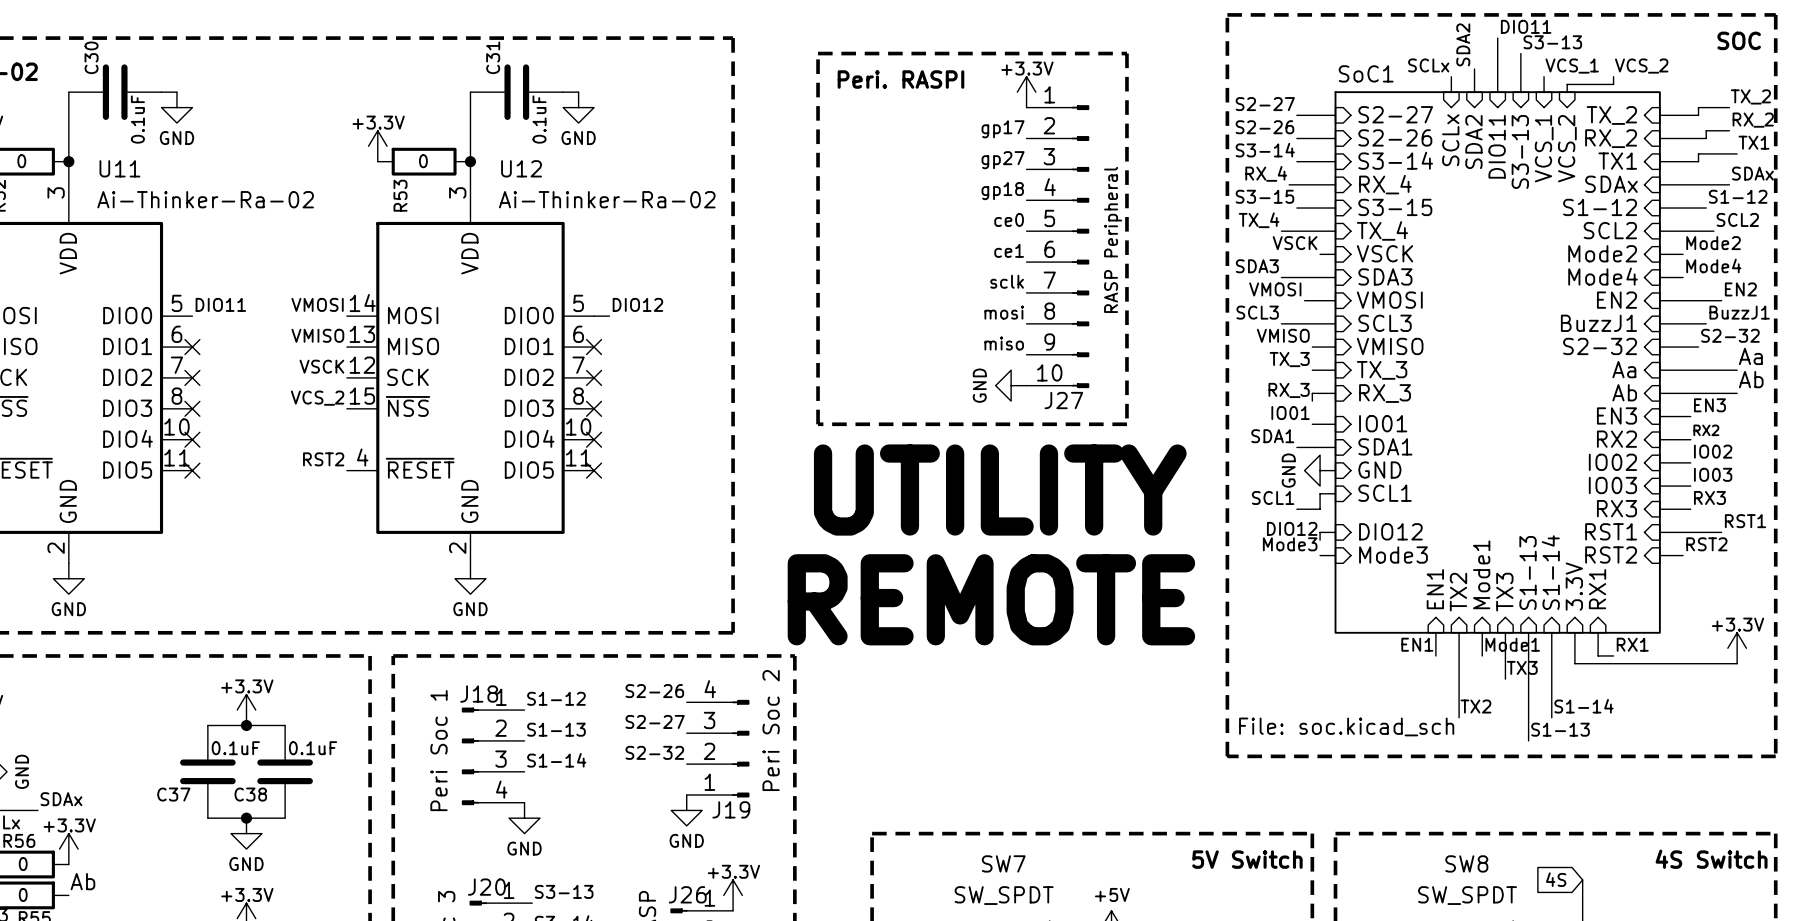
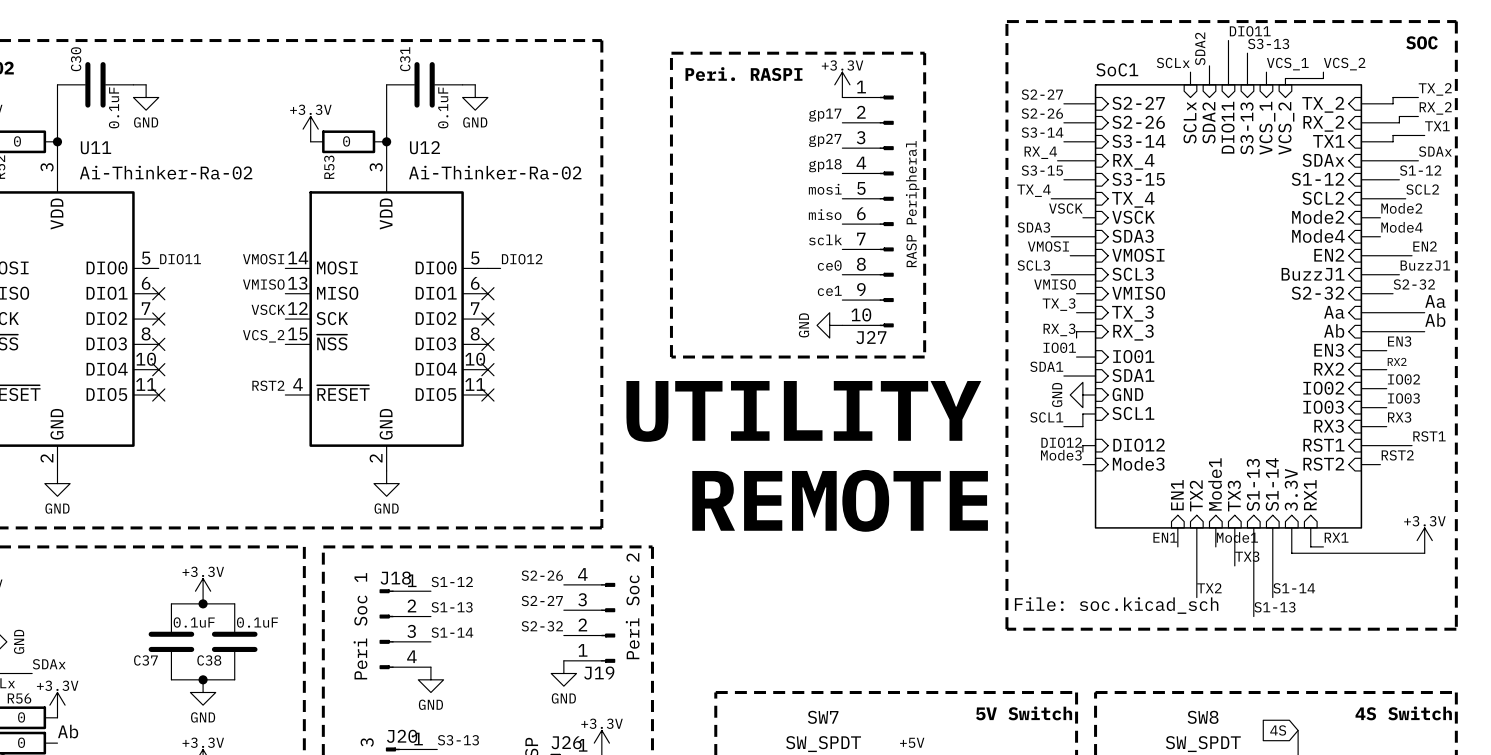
label: ce0 (1009, 219) -> mosi (825, 189)
label: ce1 (1009, 250) -> miso (825, 214)
label: mosi (1004, 312) -> ce0 (829, 265)
label: miso (1004, 343) -> ce1 (829, 290)

